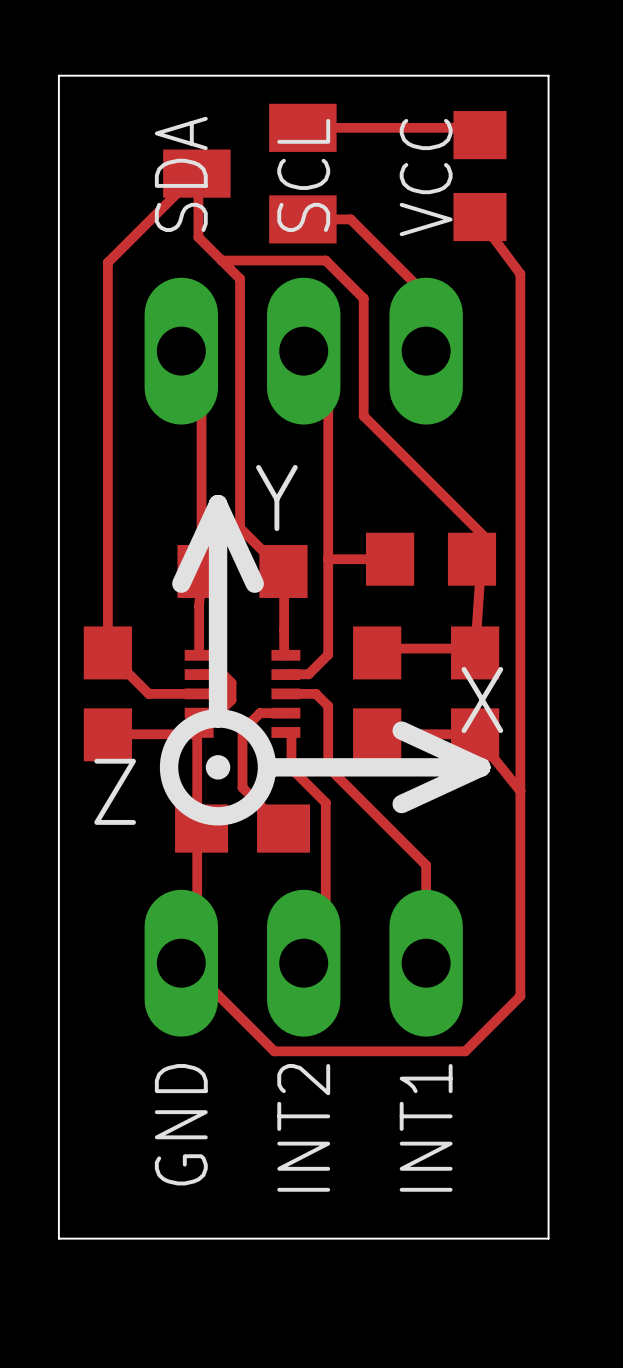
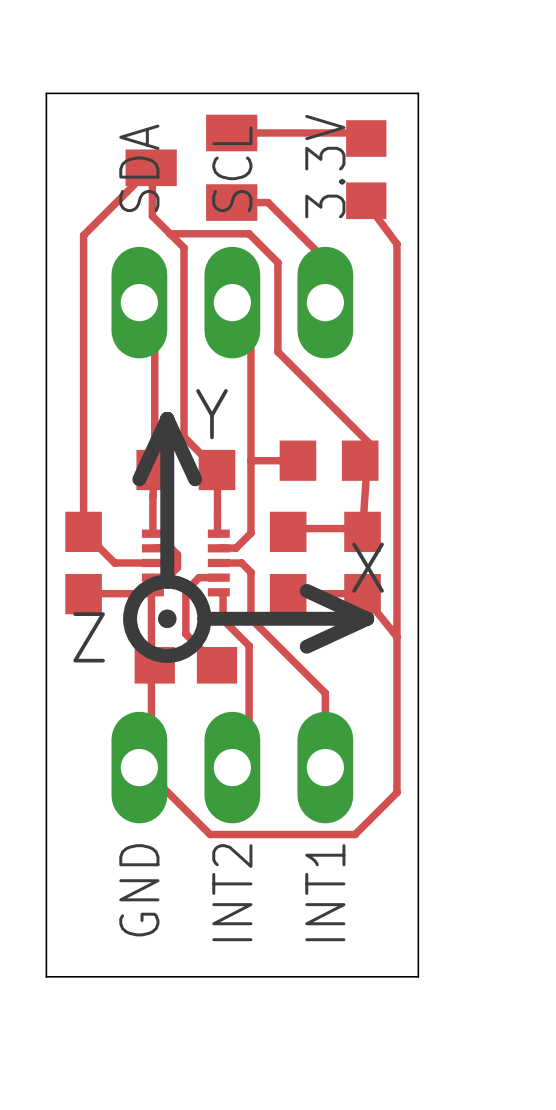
text: VCC (426, 177) -> 3.3V (325, 166)

